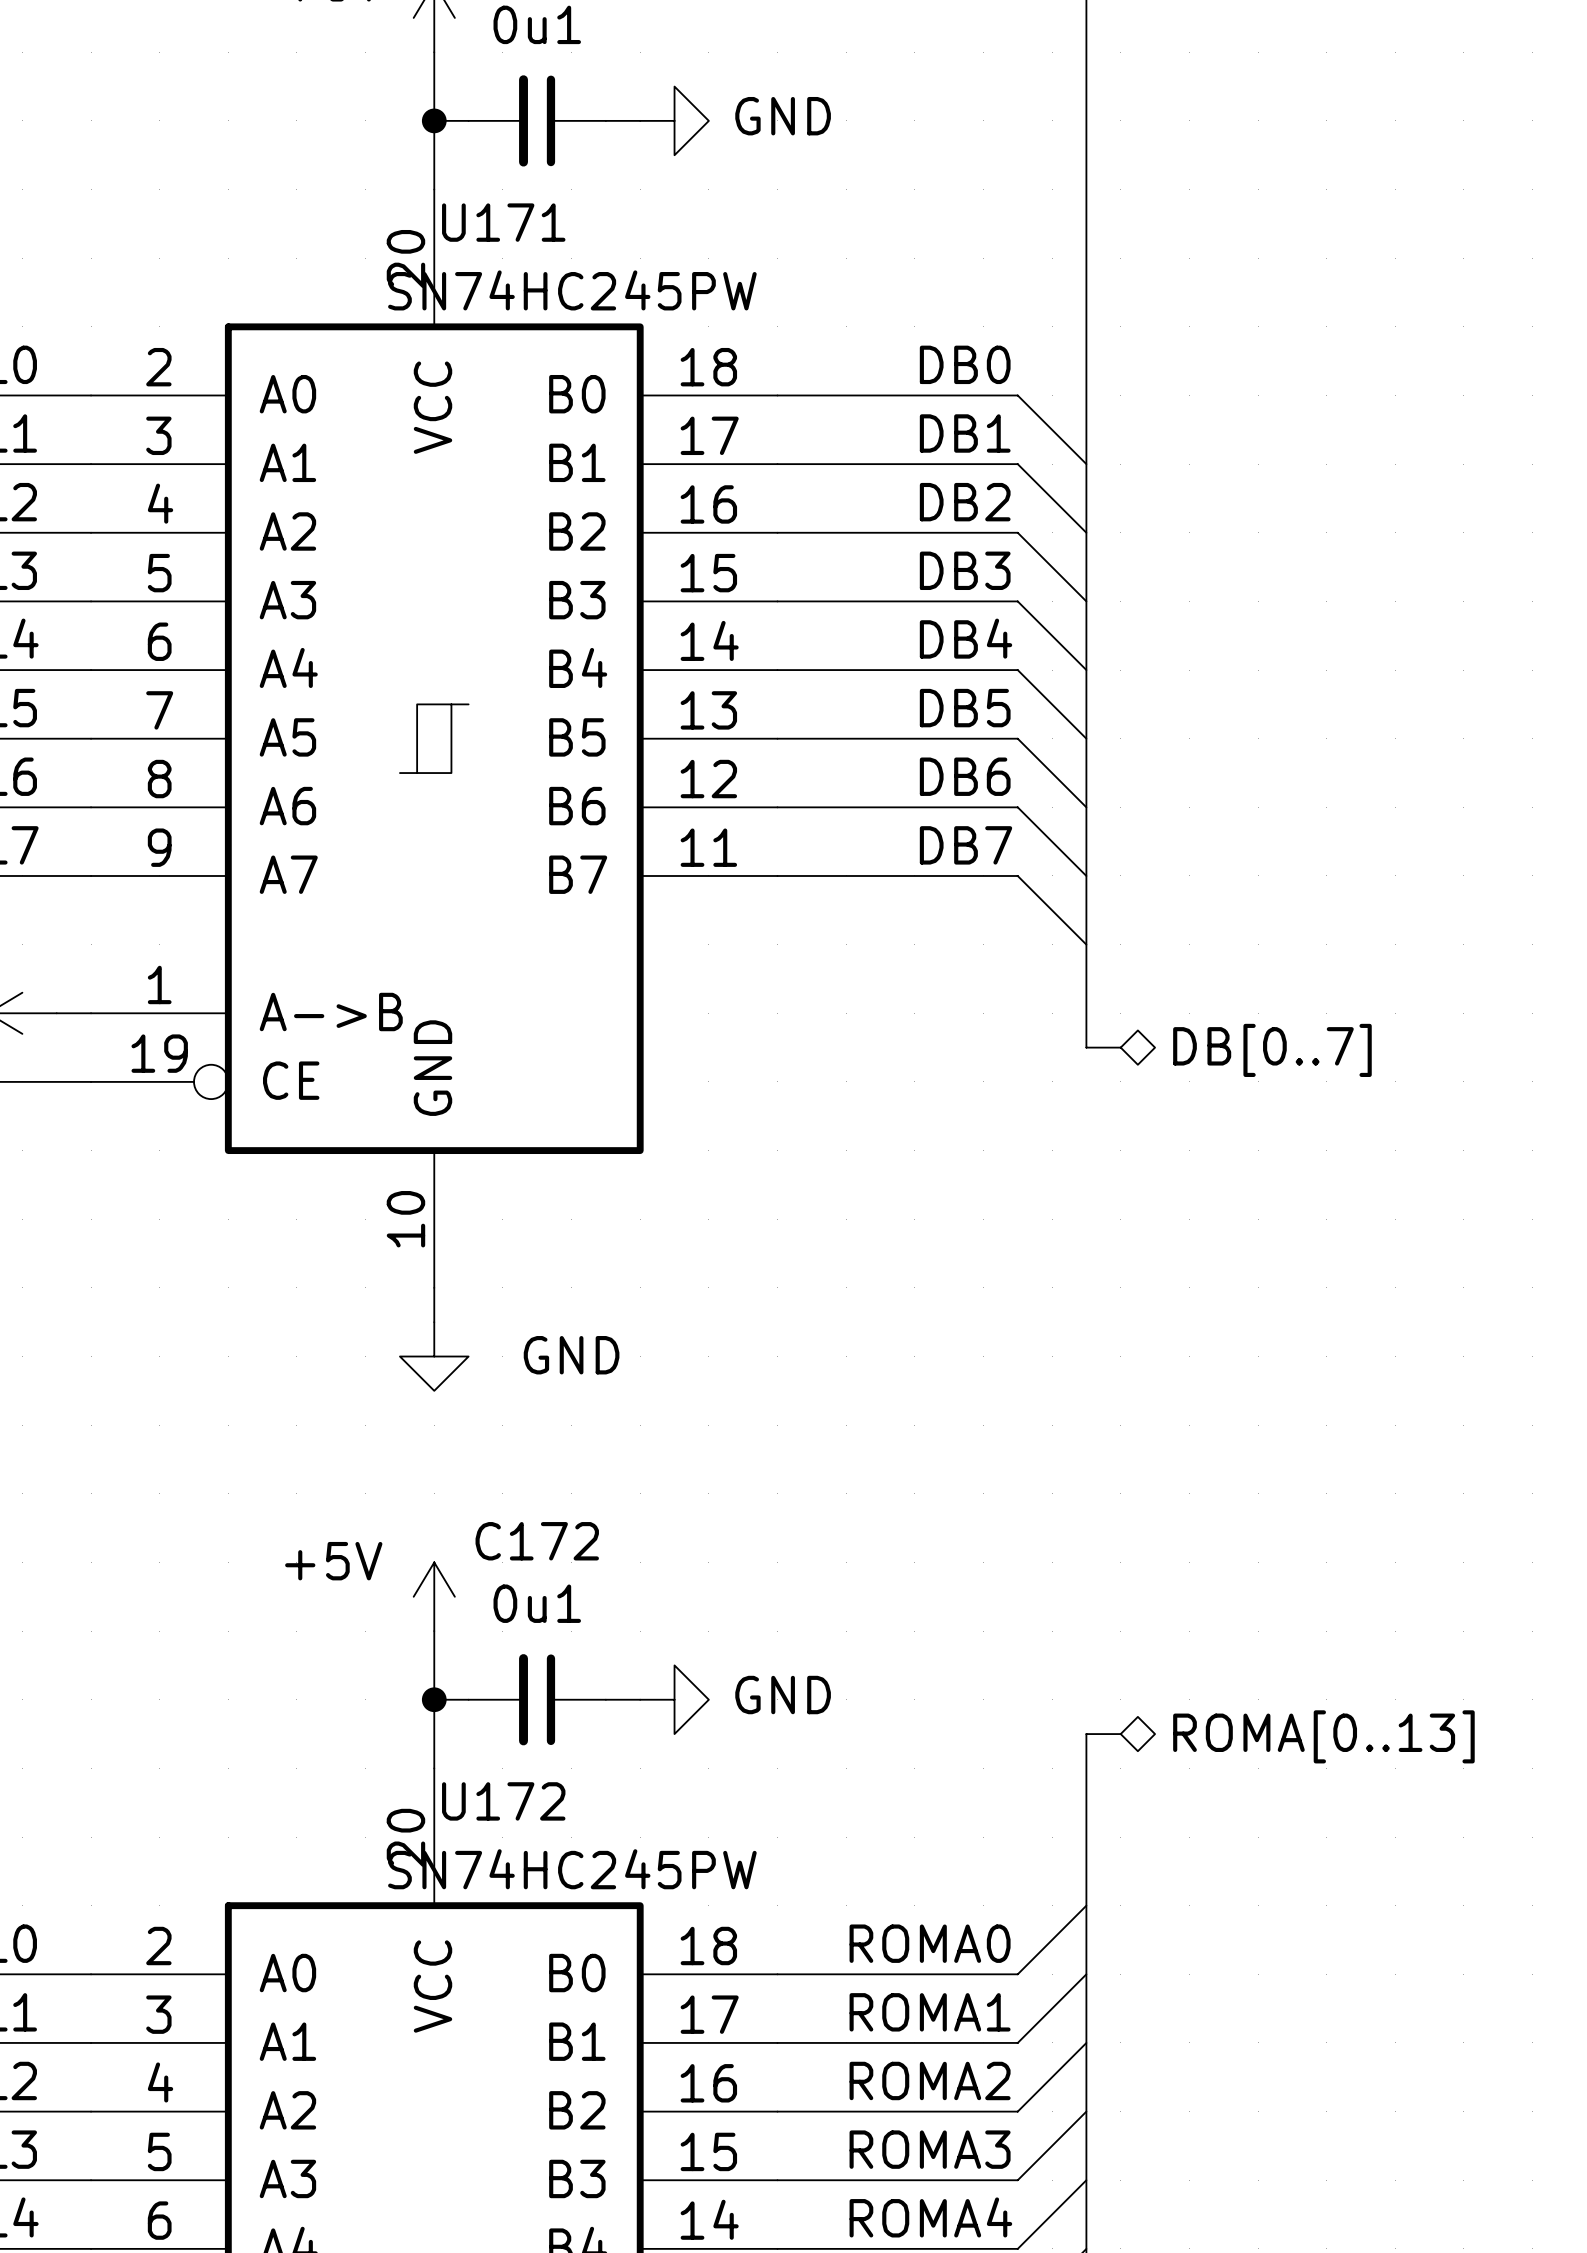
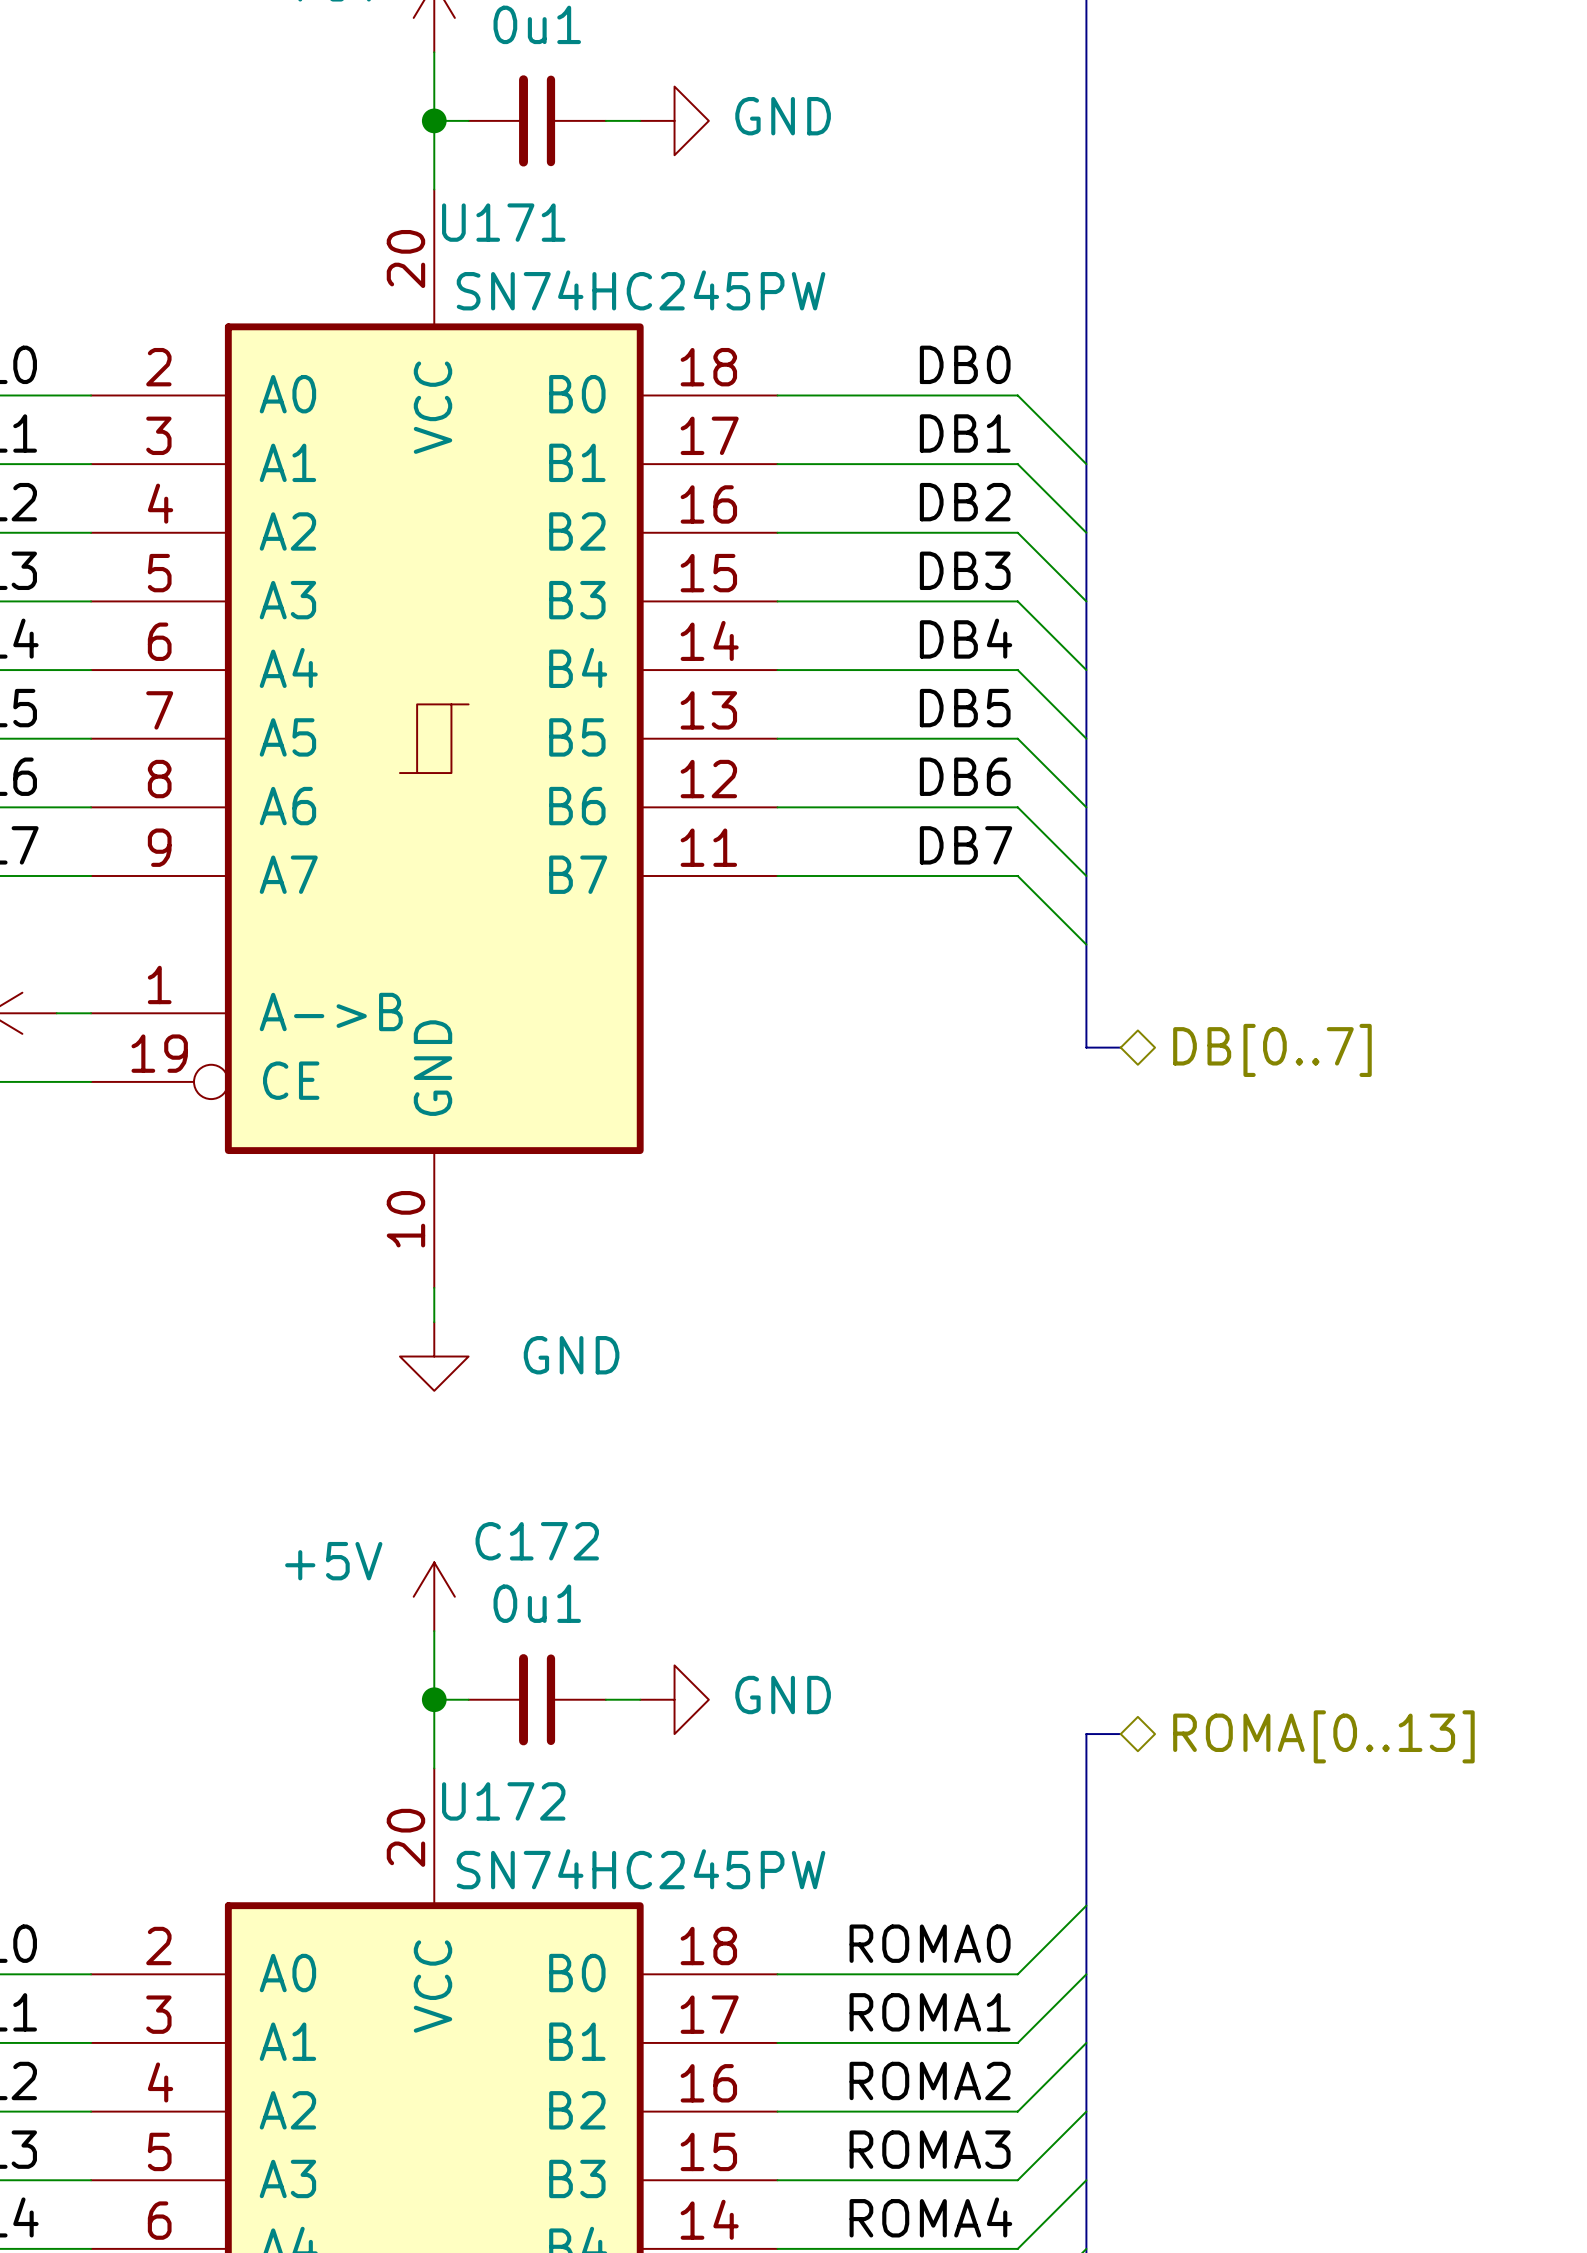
U171 value position: SN74HC245PW (572, 290) -> SN74HC245PW (641, 290)
U172 value position: SN74HC245PW (572, 1869) -> SN74HC245PW (641, 1869)

